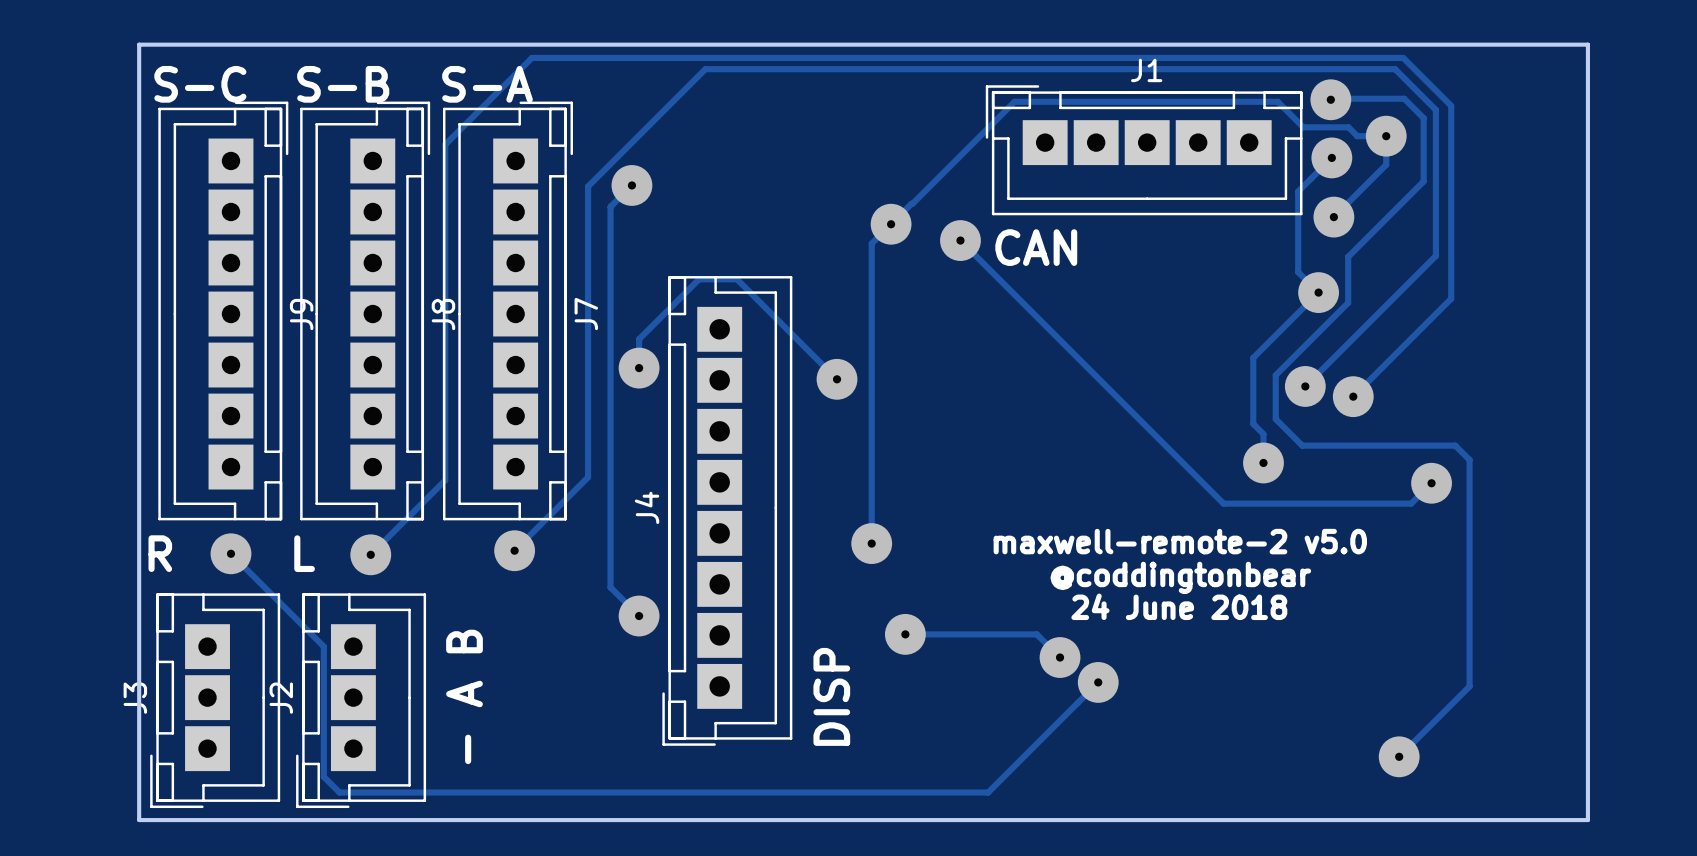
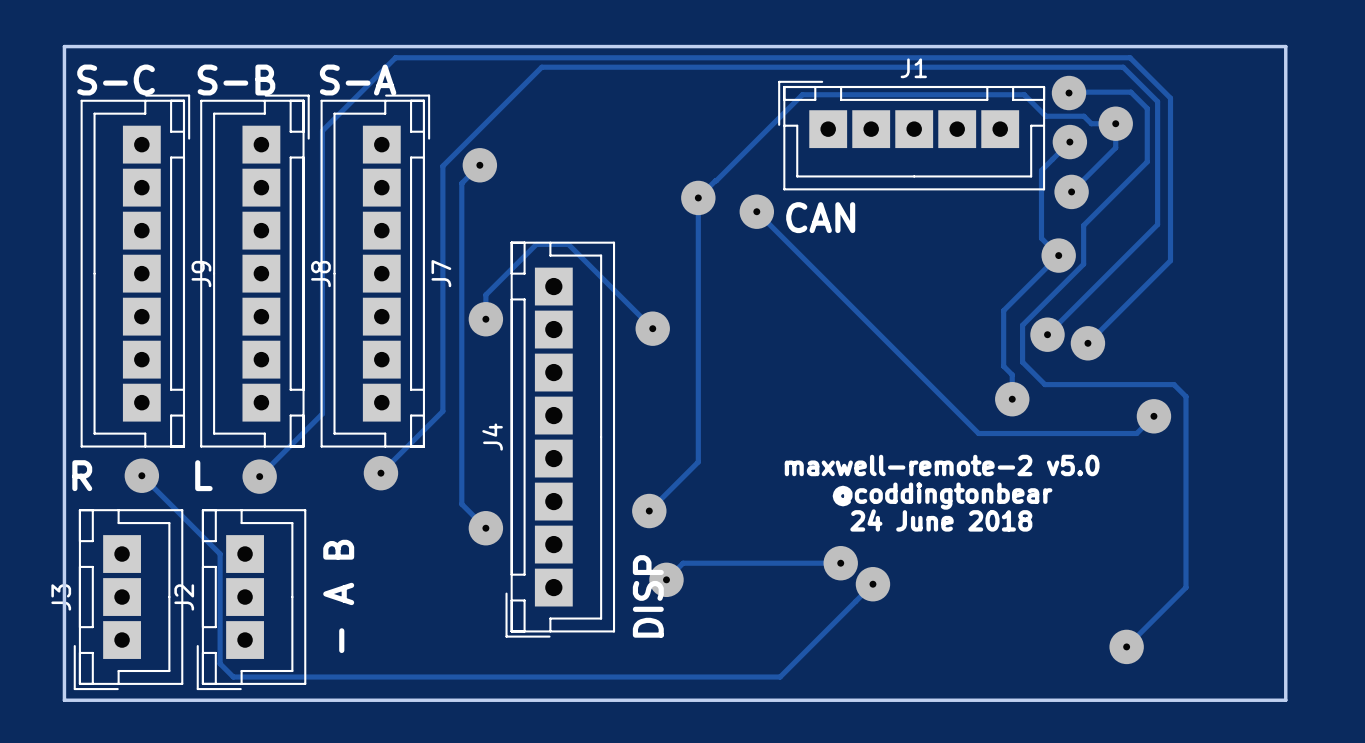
track: (891, 224) (871, 243) (871, 543) -> (698, 197) (698, 462) (649, 511)
via: (871, 543) -> none
via: none -> (649, 511)
track: (905, 634) (1036, 634) (1060, 657) -> (666, 579) (683, 563) (840, 563)
via: (905, 634) -> none
via: none -> (666, 579)

